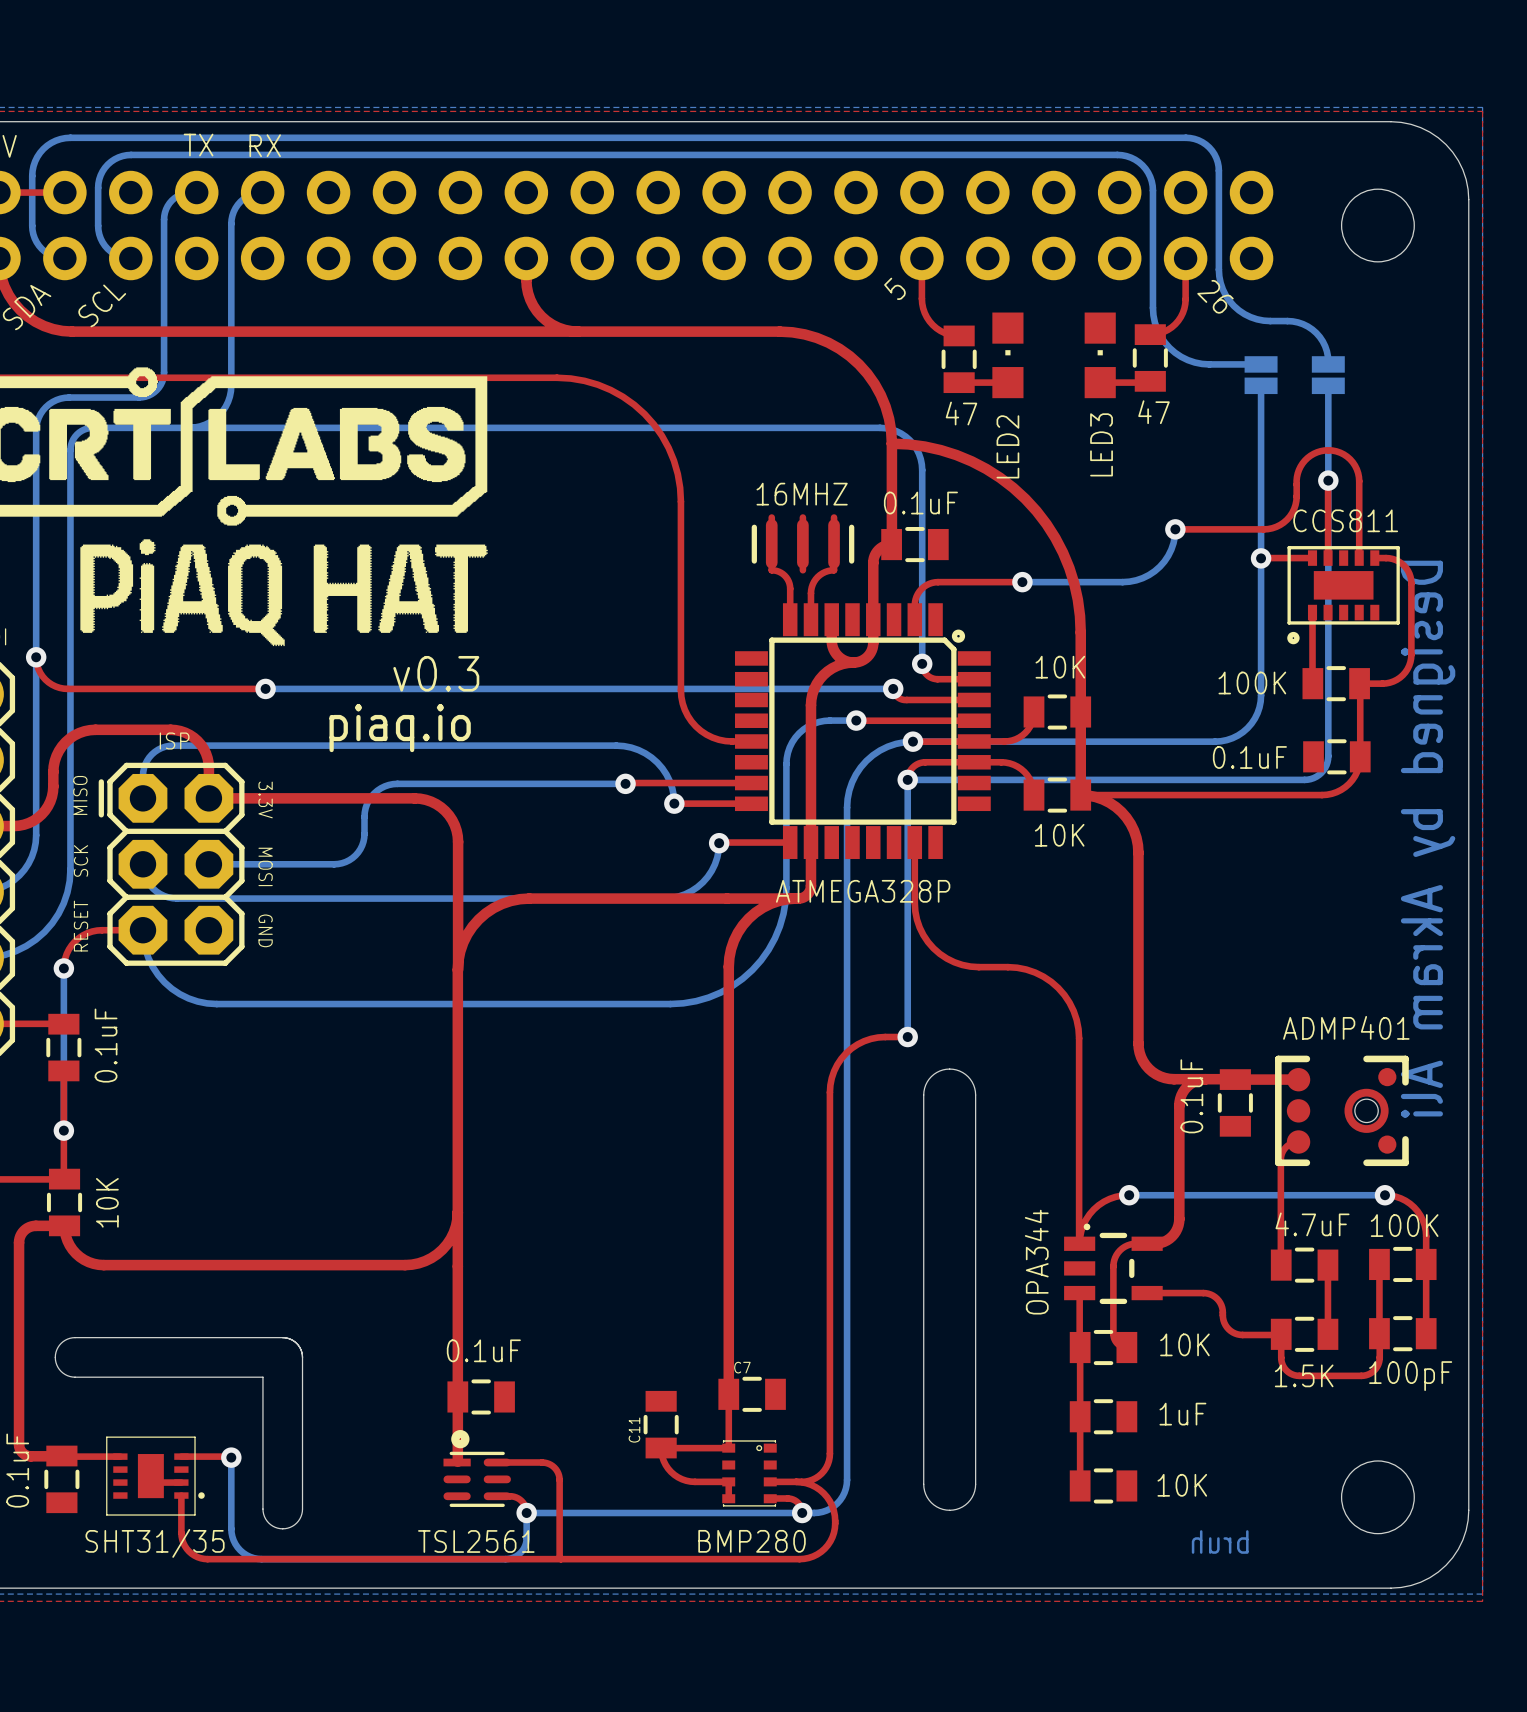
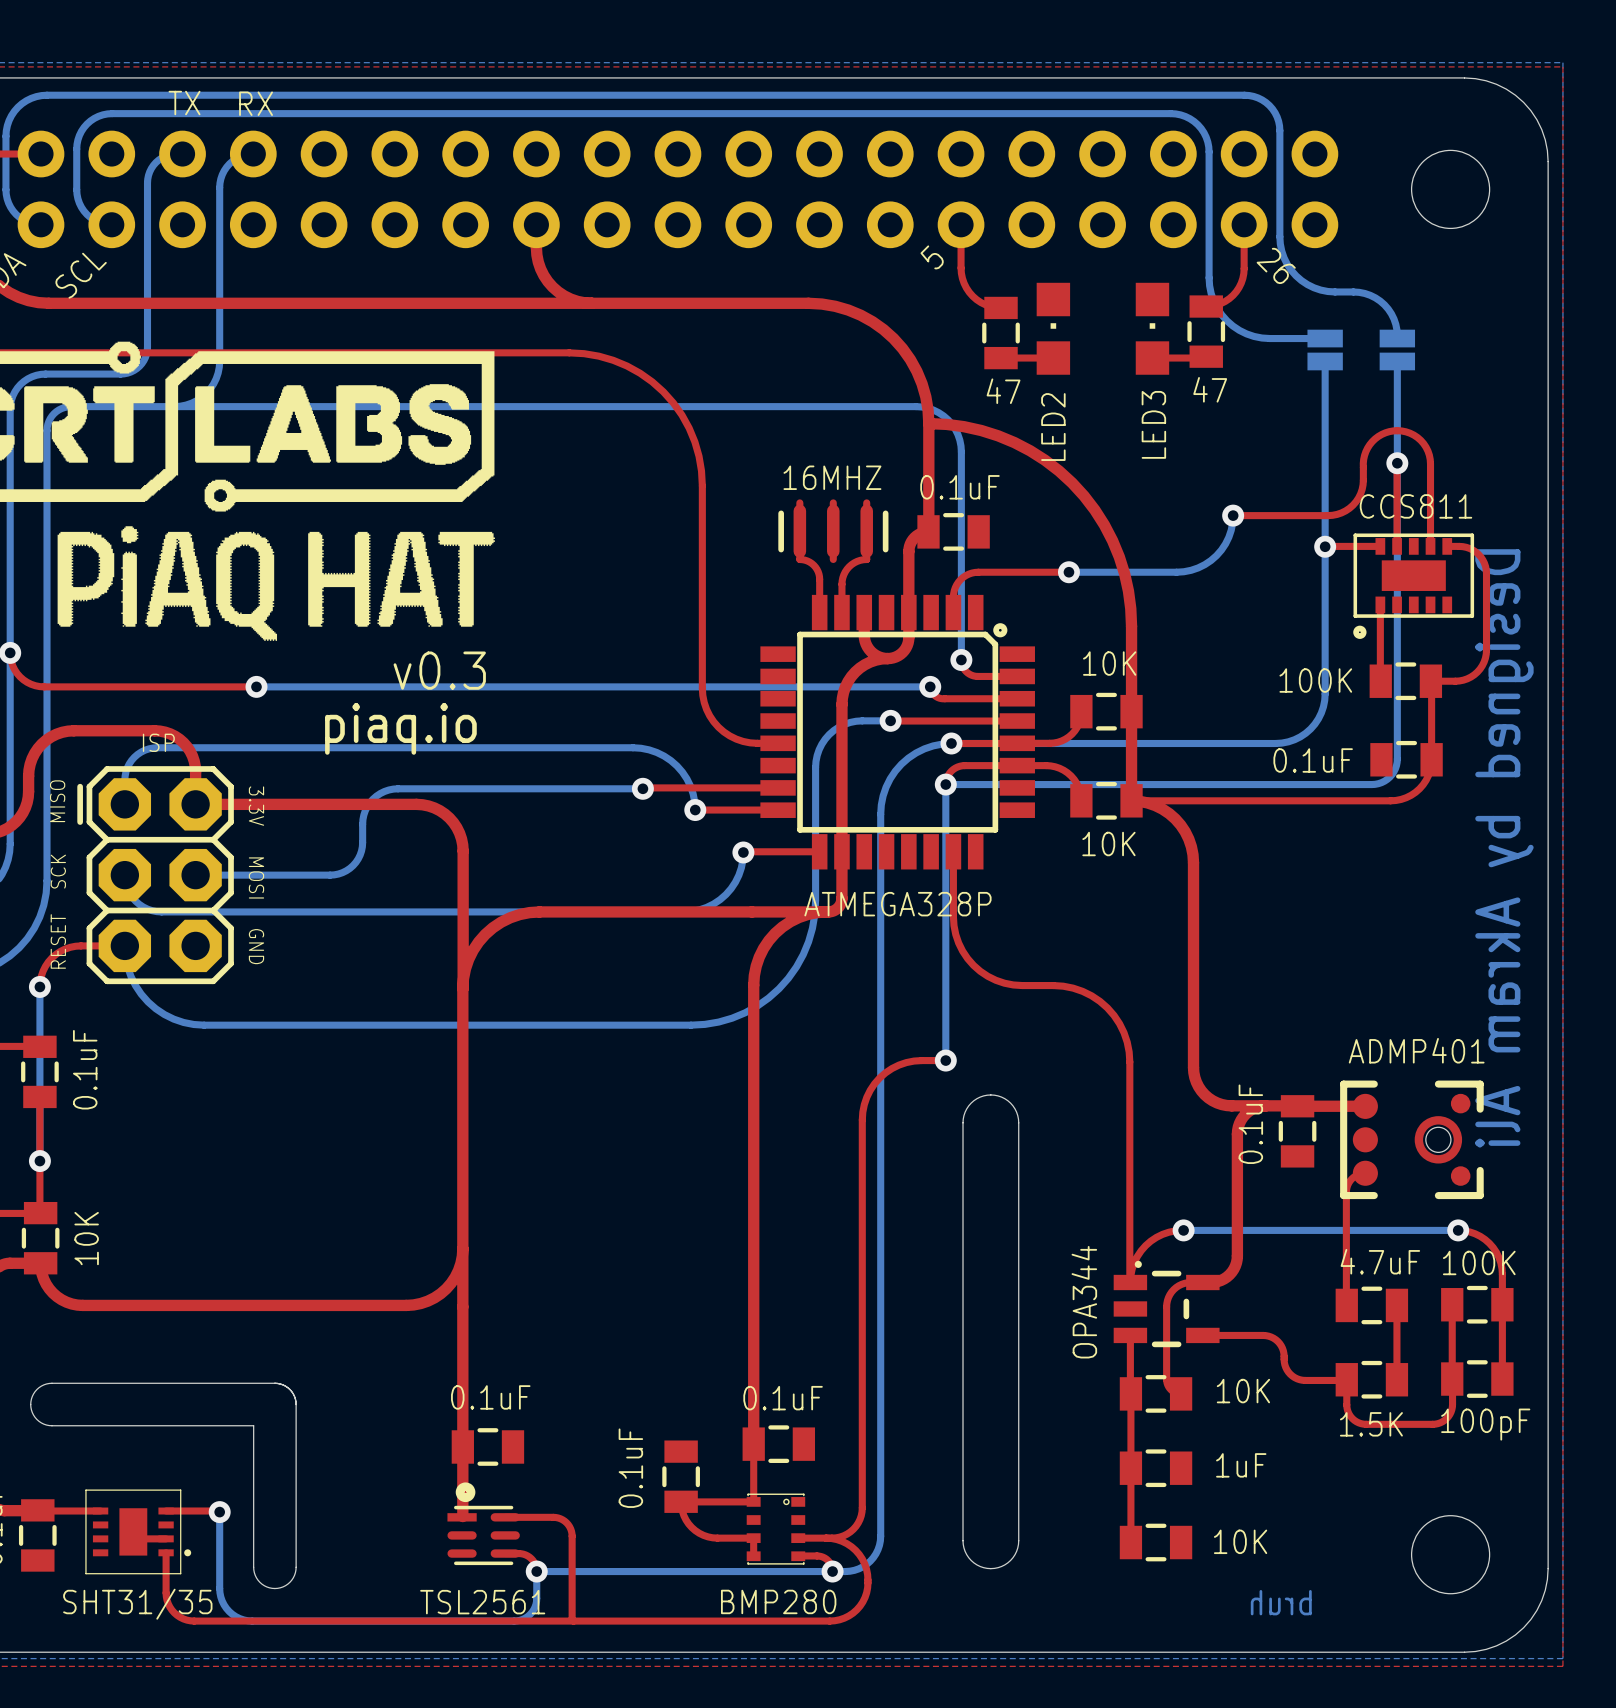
C7 value: none -> 0.1uF (783, 1398)
C7 name: C7 (742, 1367) -> none
C11 value: none -> 0.1uF (630, 1468)
C11 name: C11 (634, 1430) -> none

